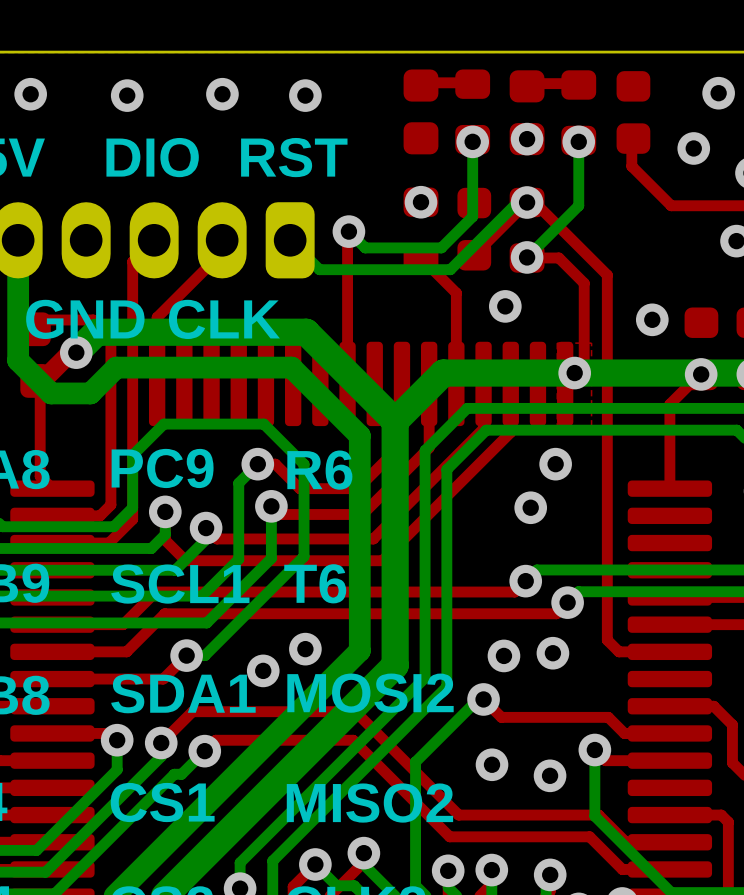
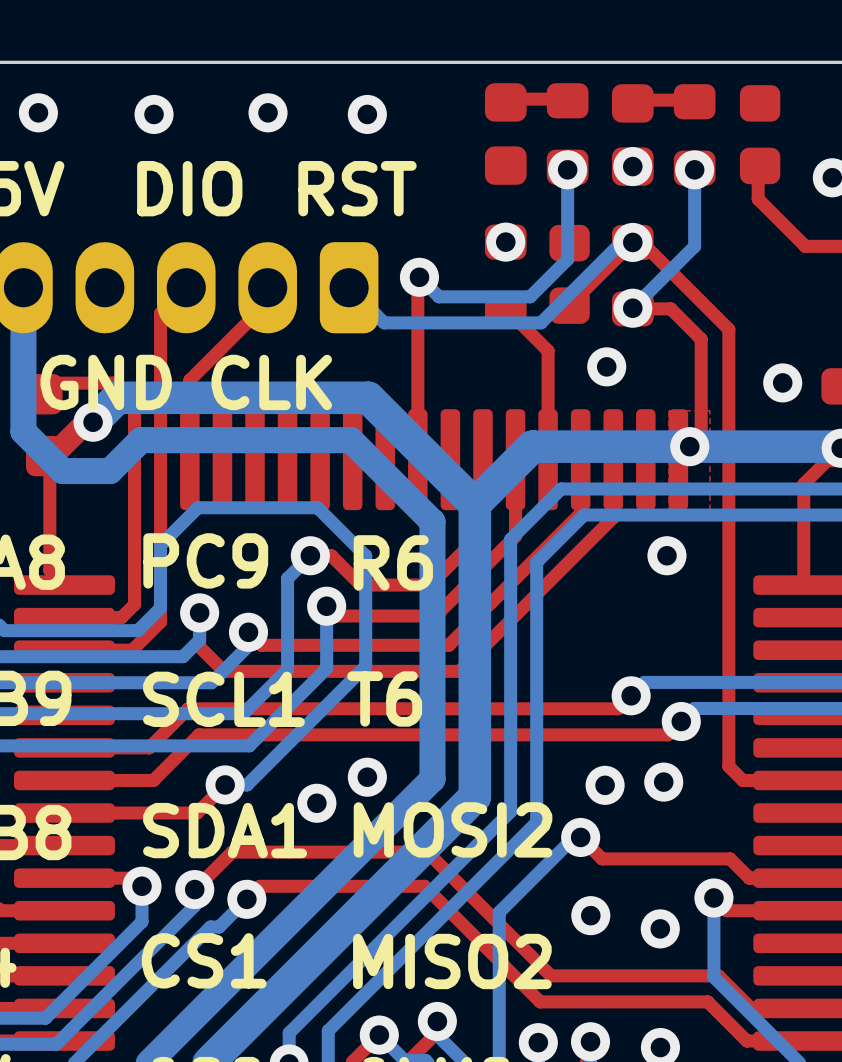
via: (530, 507) -> none

